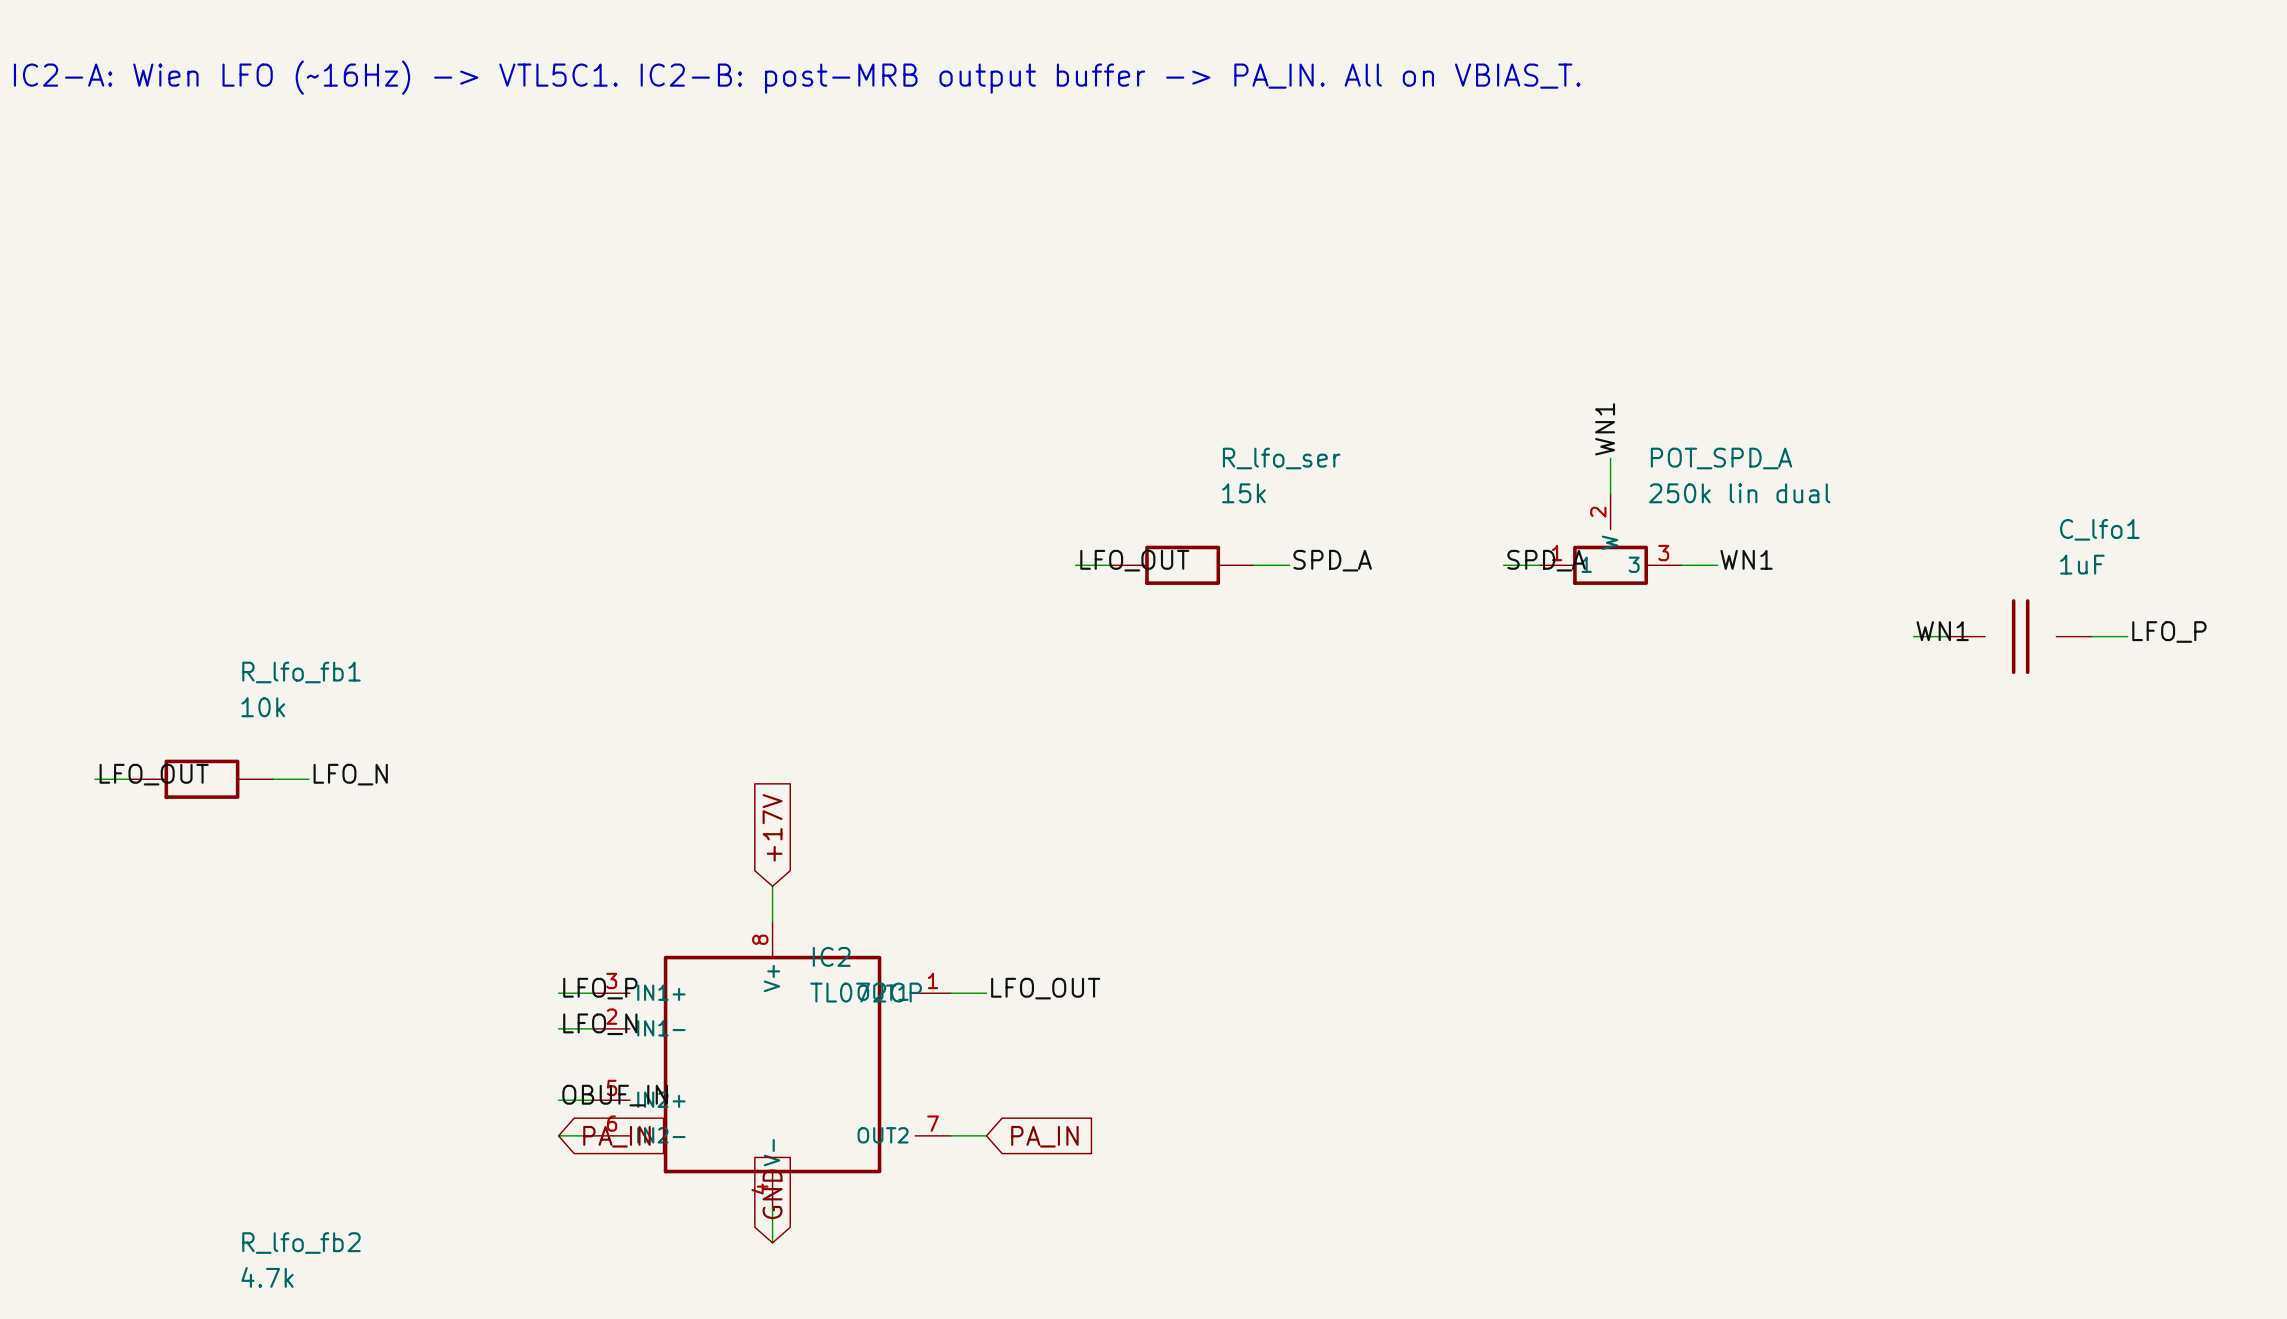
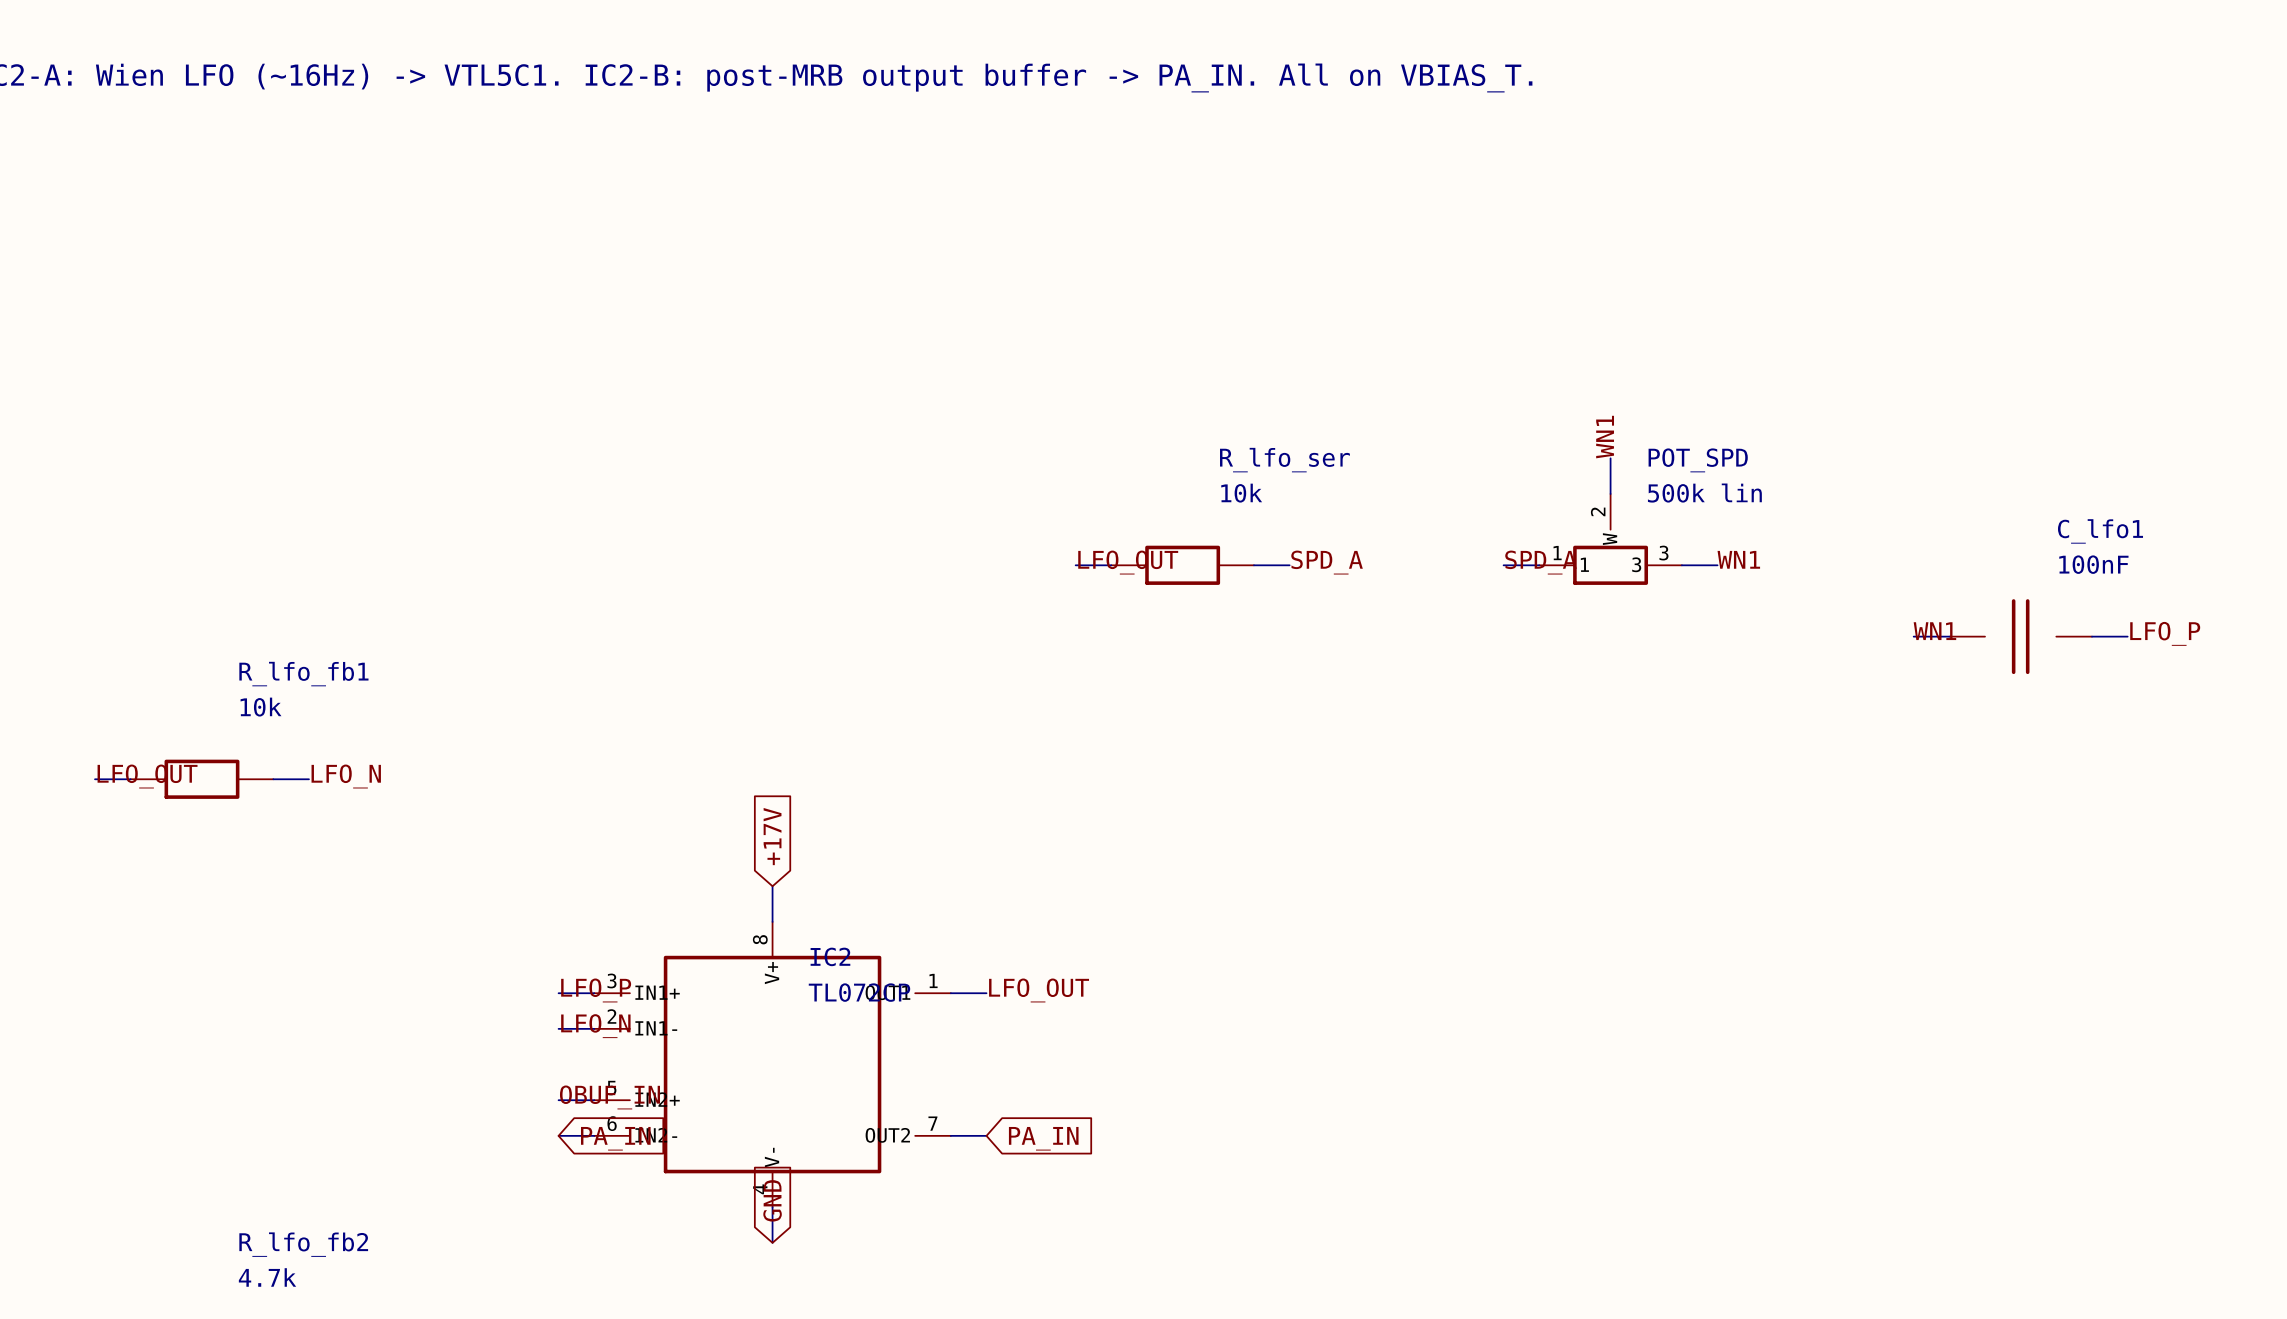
POT_SPD_A name: POT_SPD_A (1721, 458) -> POT_SPD (1698, 460)
R_lfo_ser value: 15k (1243, 493) -> 10k (1241, 493)
POT_SPD_A value: 250k lin dual (1739, 493) -> 500k lin (1704, 493)
C_lfo1 value: 1uF (2082, 564) -> 100nF (2093, 564)

